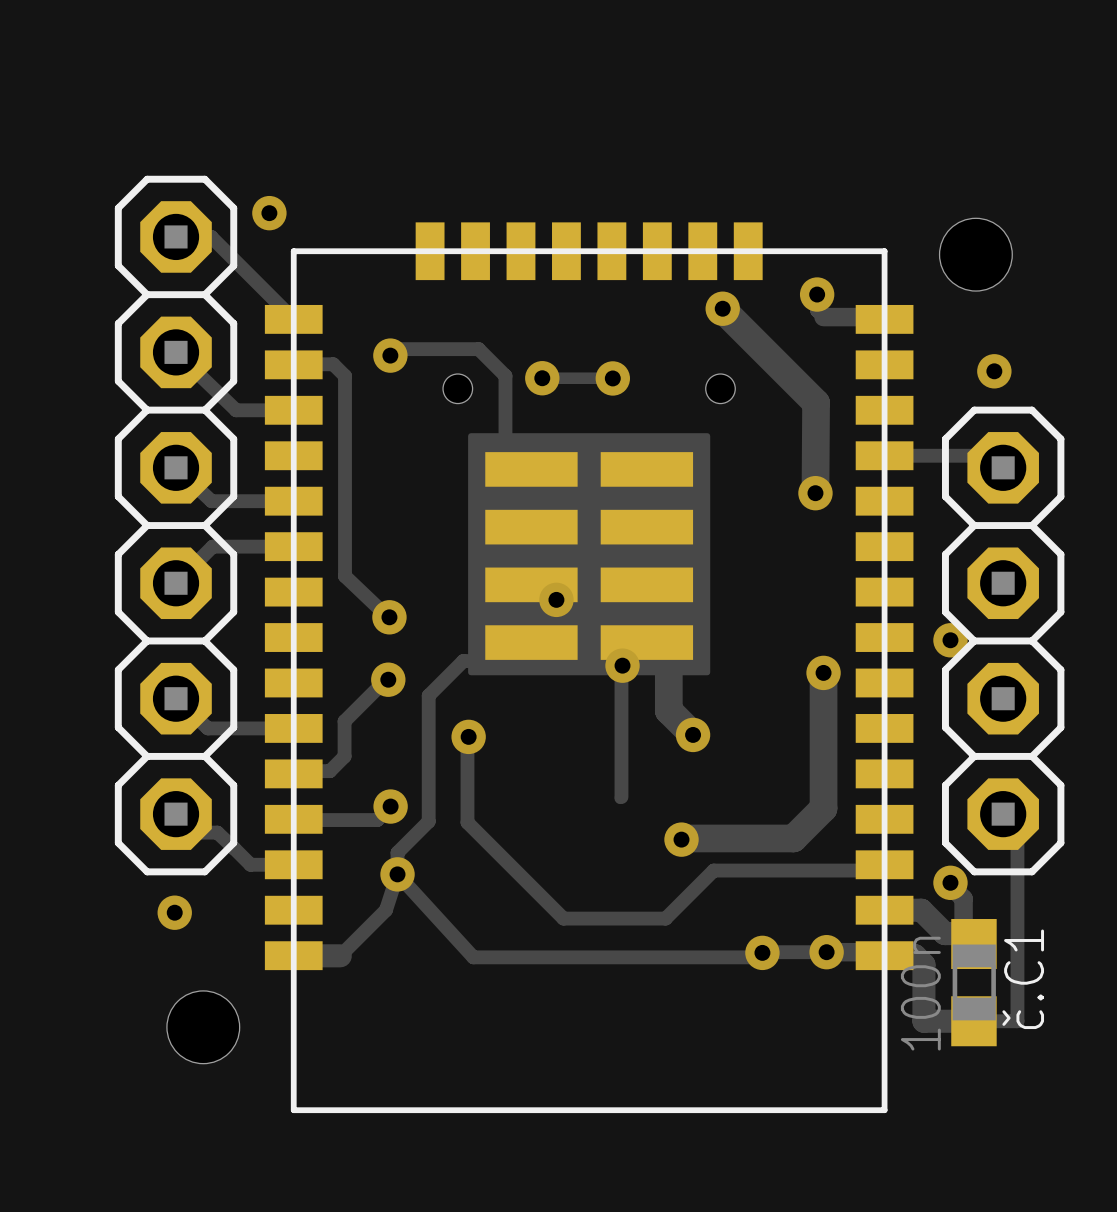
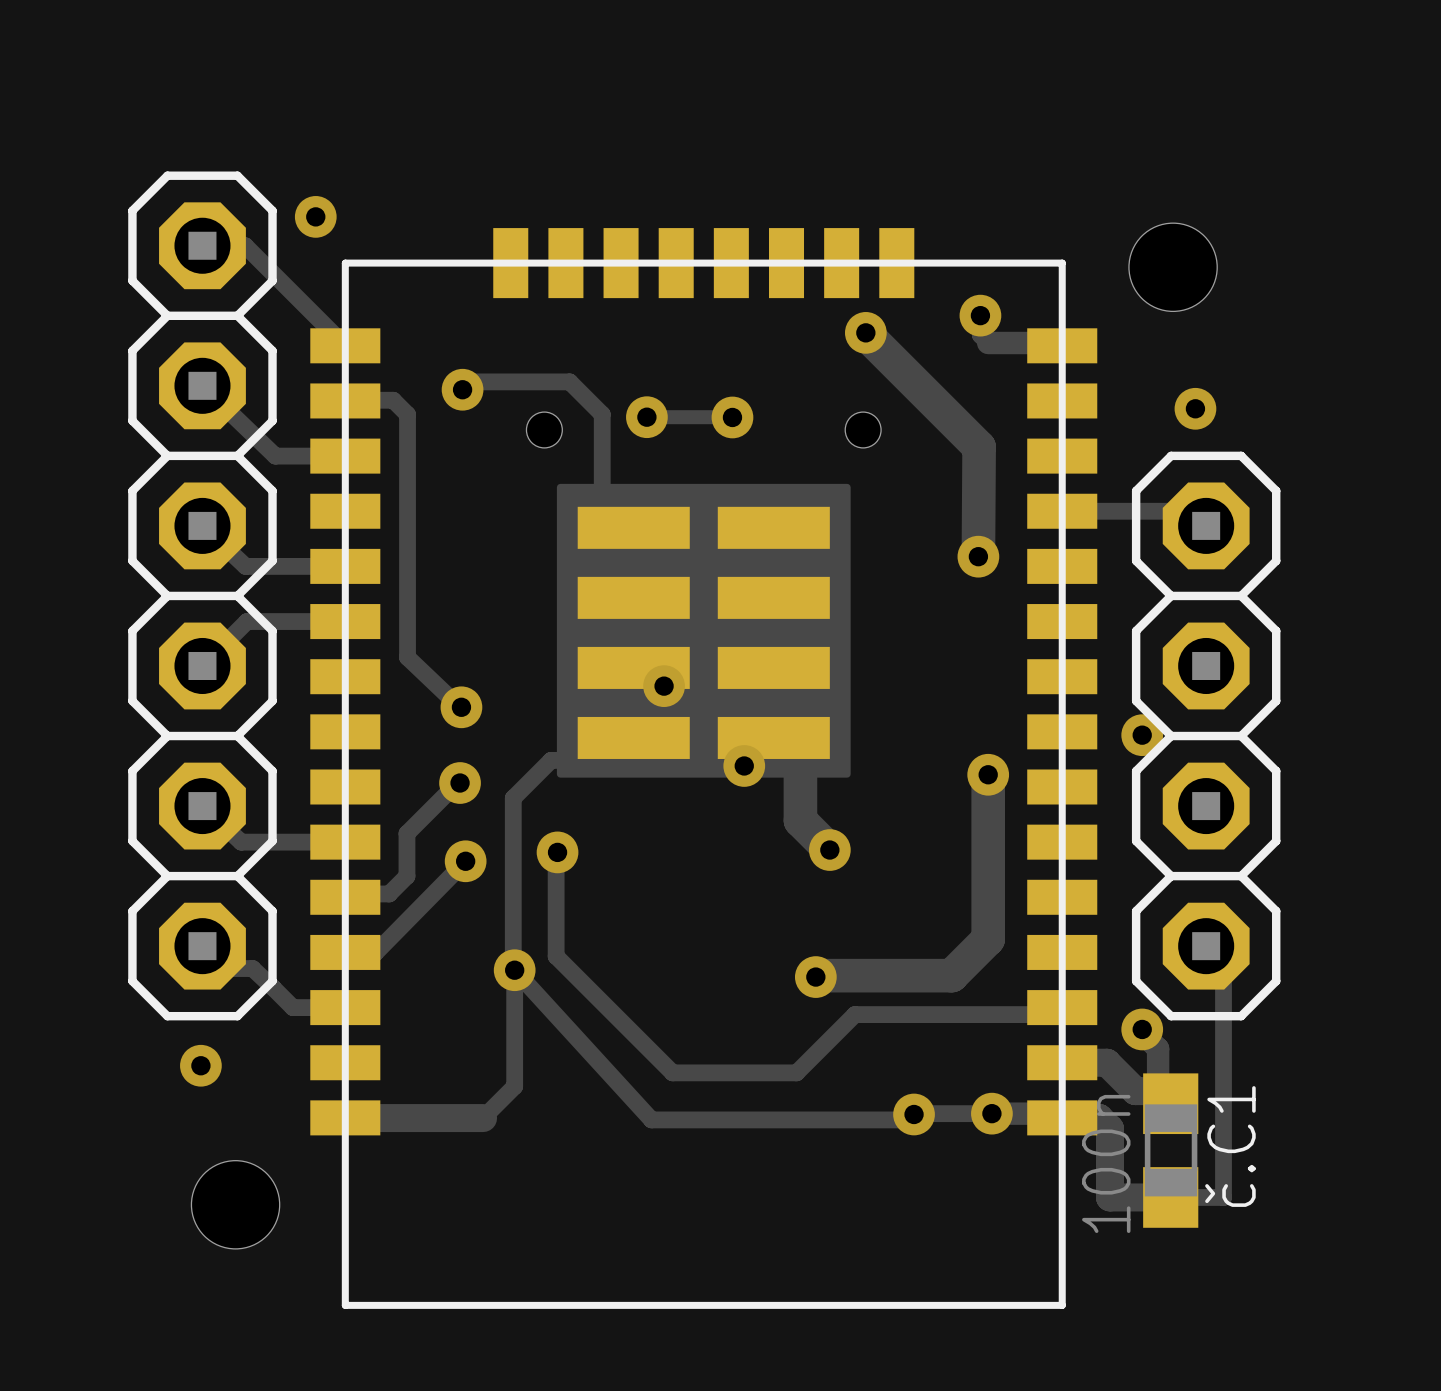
track: (621, 590) (620, 798) -> none
track: (432, 692) (428, 695) (428, 821) (397, 852) (397, 874) -> (513, 798) (514, 970)
via: none -> (465, 861)
track: (390, 806) (377, 820) (318, 820) -> (465, 861) (375, 953)
via: (390, 806) -> none
via: none -> (514, 970)
track: (397, 874) (385, 910) (340, 955) -> (514, 970) (514, 1086) (483, 1118) (401, 1118)
track: (397, 874) (473, 957) (546, 957) -> (514, 970) (651, 1119)
via: (397, 874) -> none

